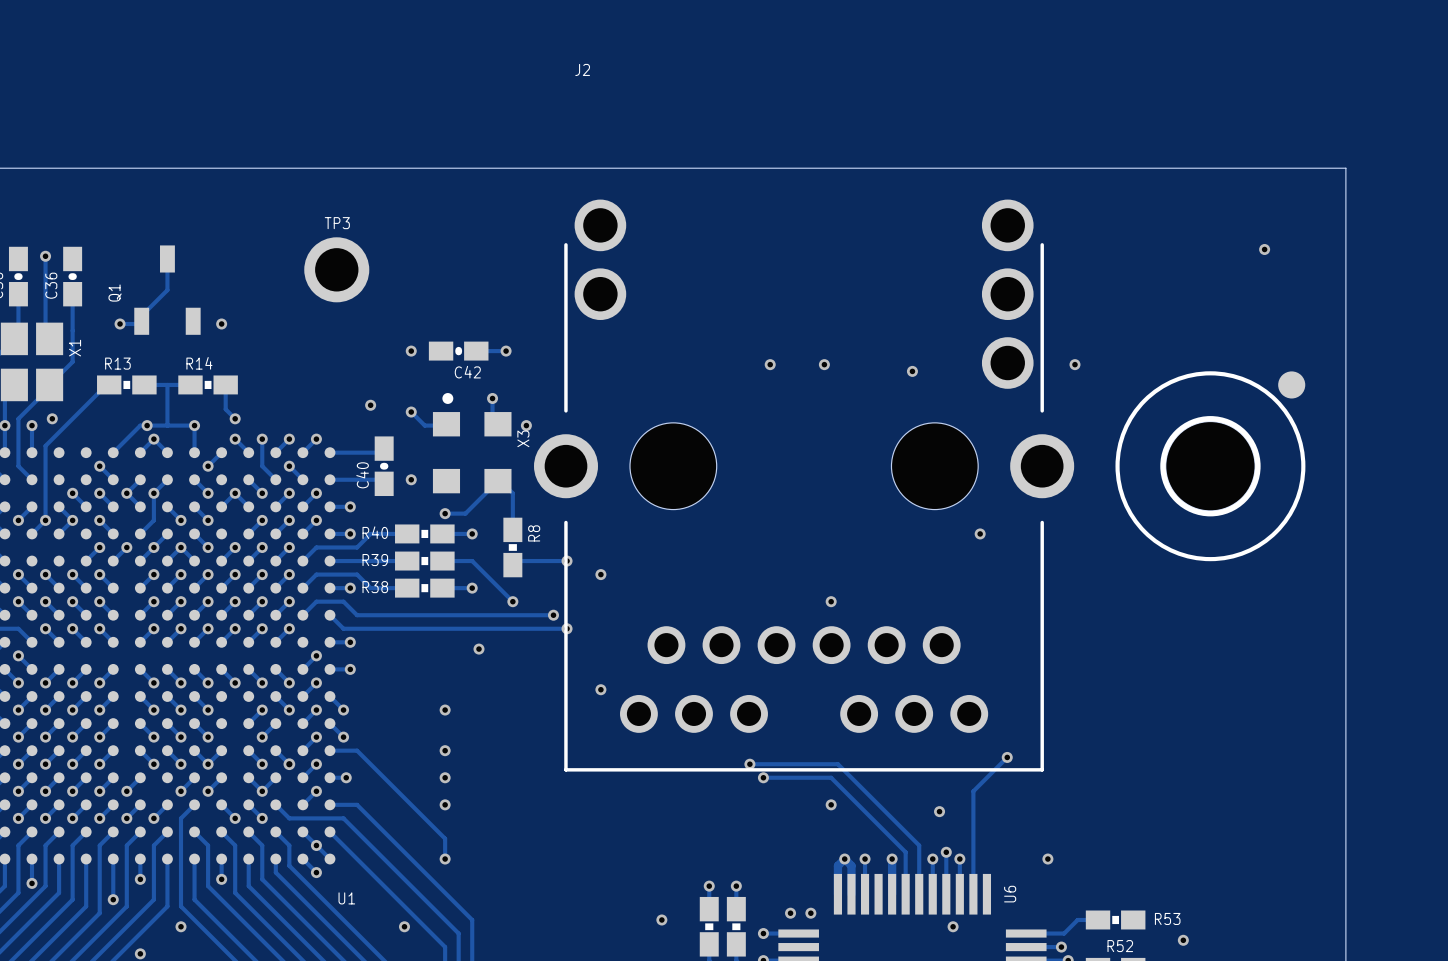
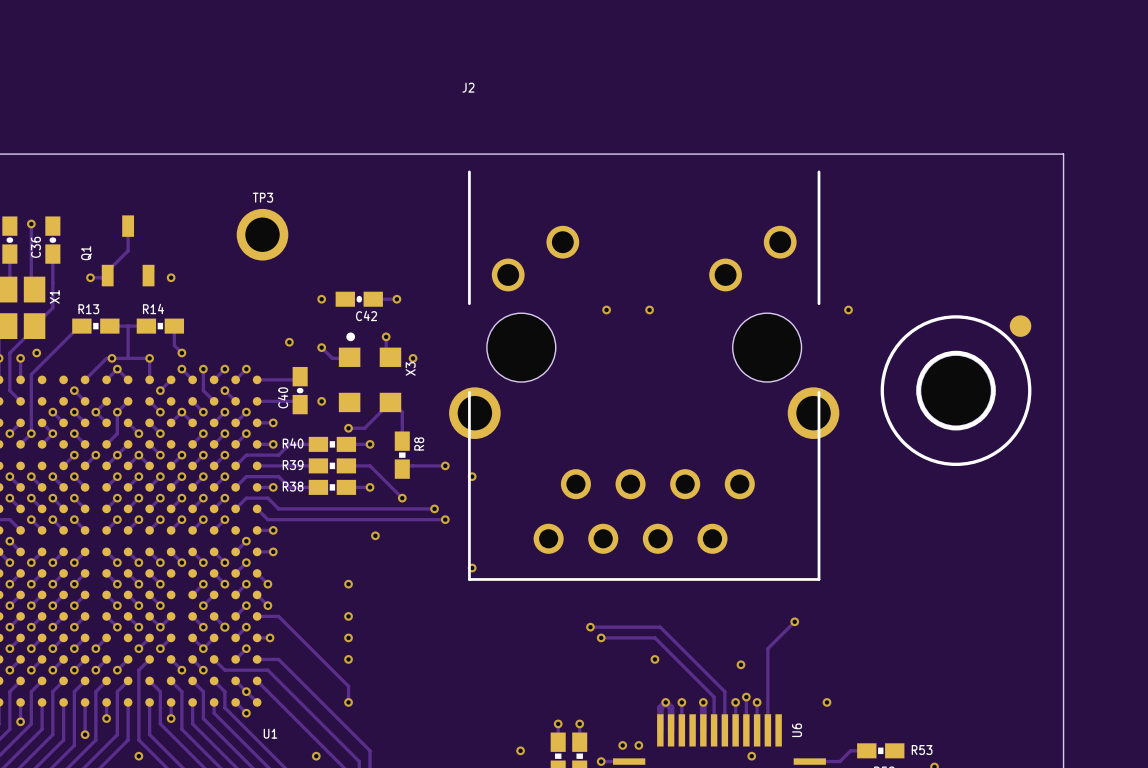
J2 footprint: [534, 199, 1075, 772] -> [449, 170, 840, 581]
via: (1264, 249) -> none
via: (912, 371) -> none
via: (980, 533) -> none
via: (831, 601) -> none

